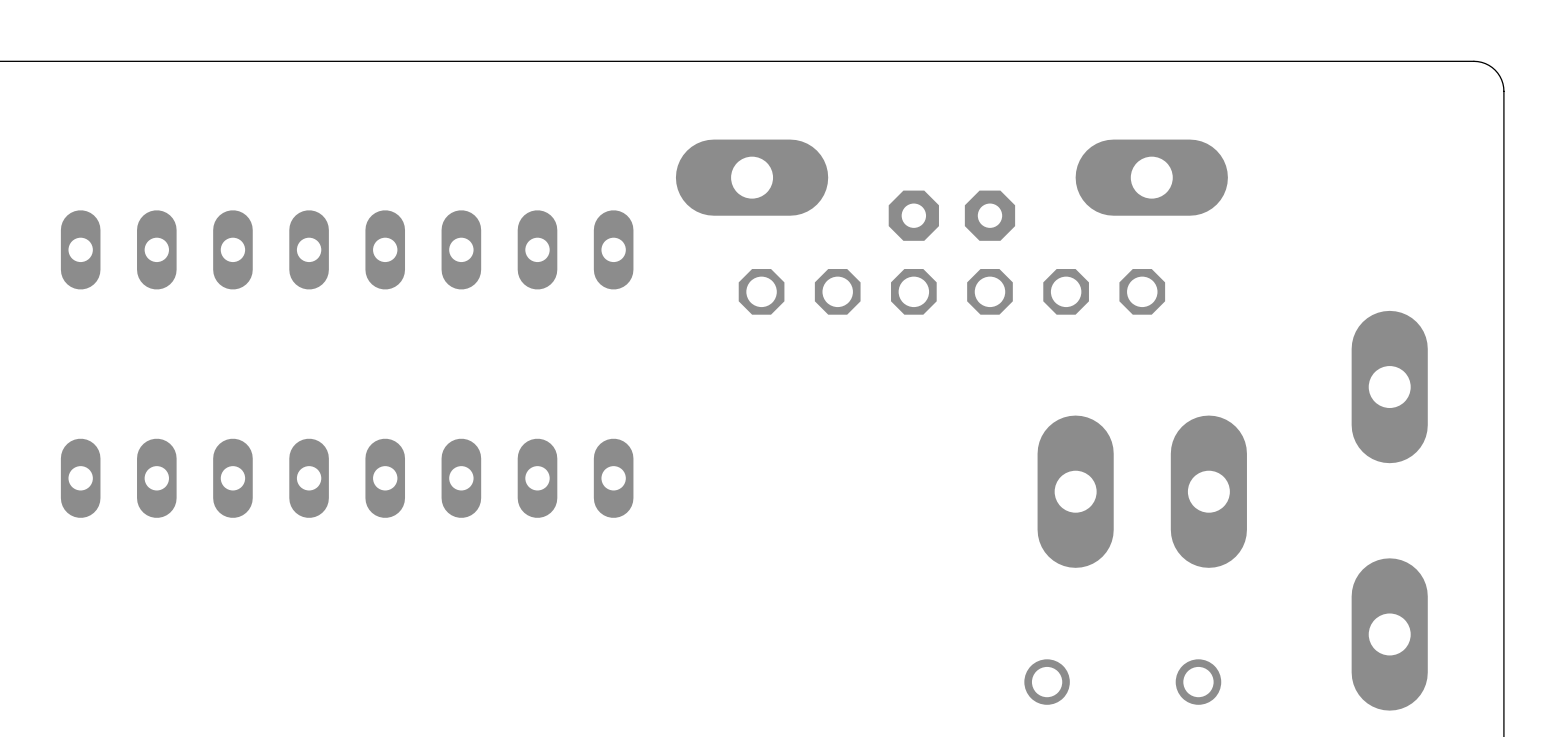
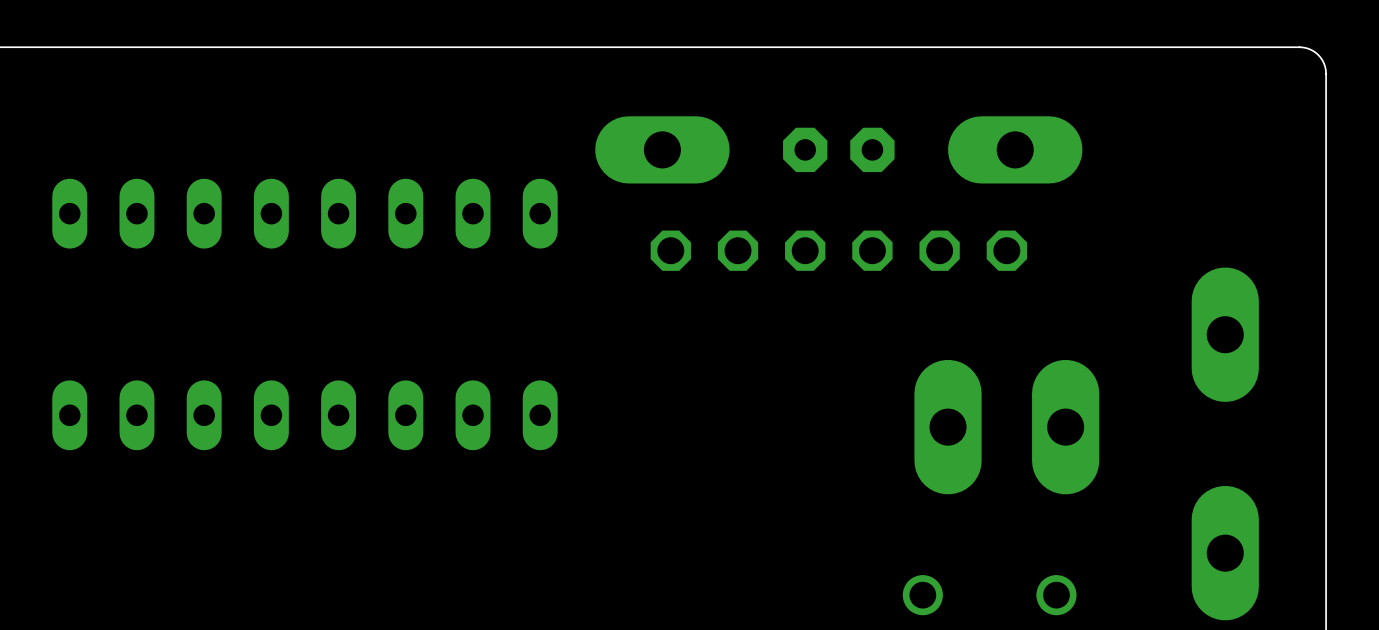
part position: (951, 215) -> (838, 149)

